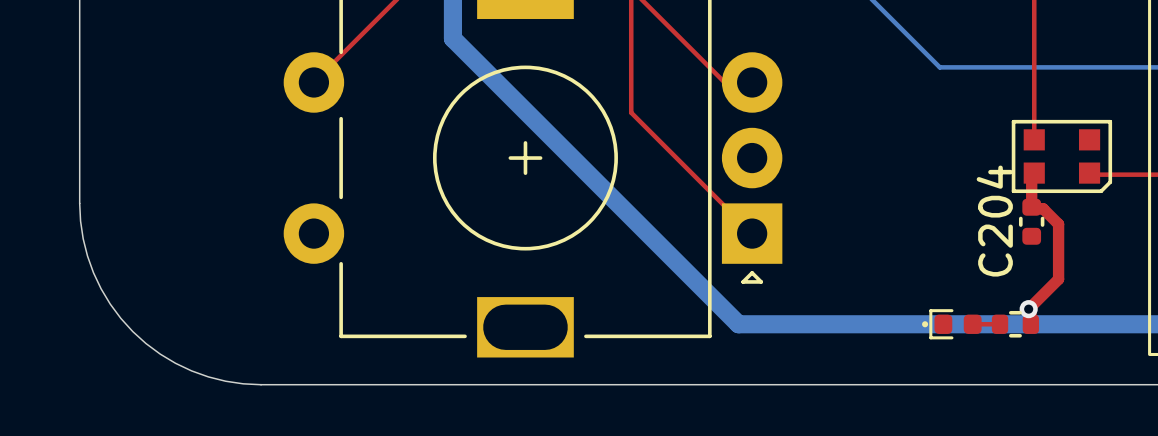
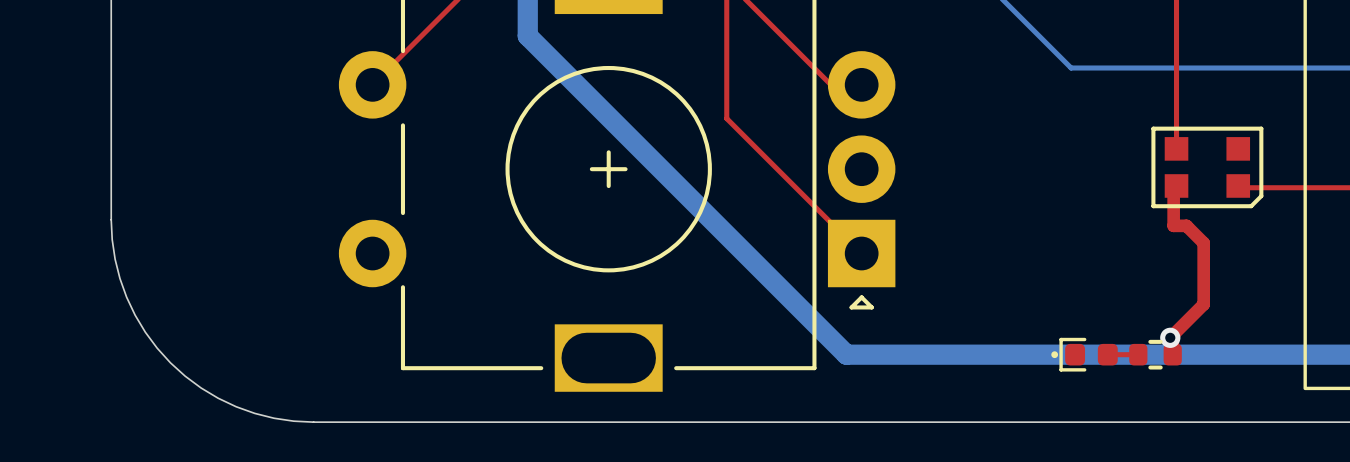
C204: (1031, 221) -> none

